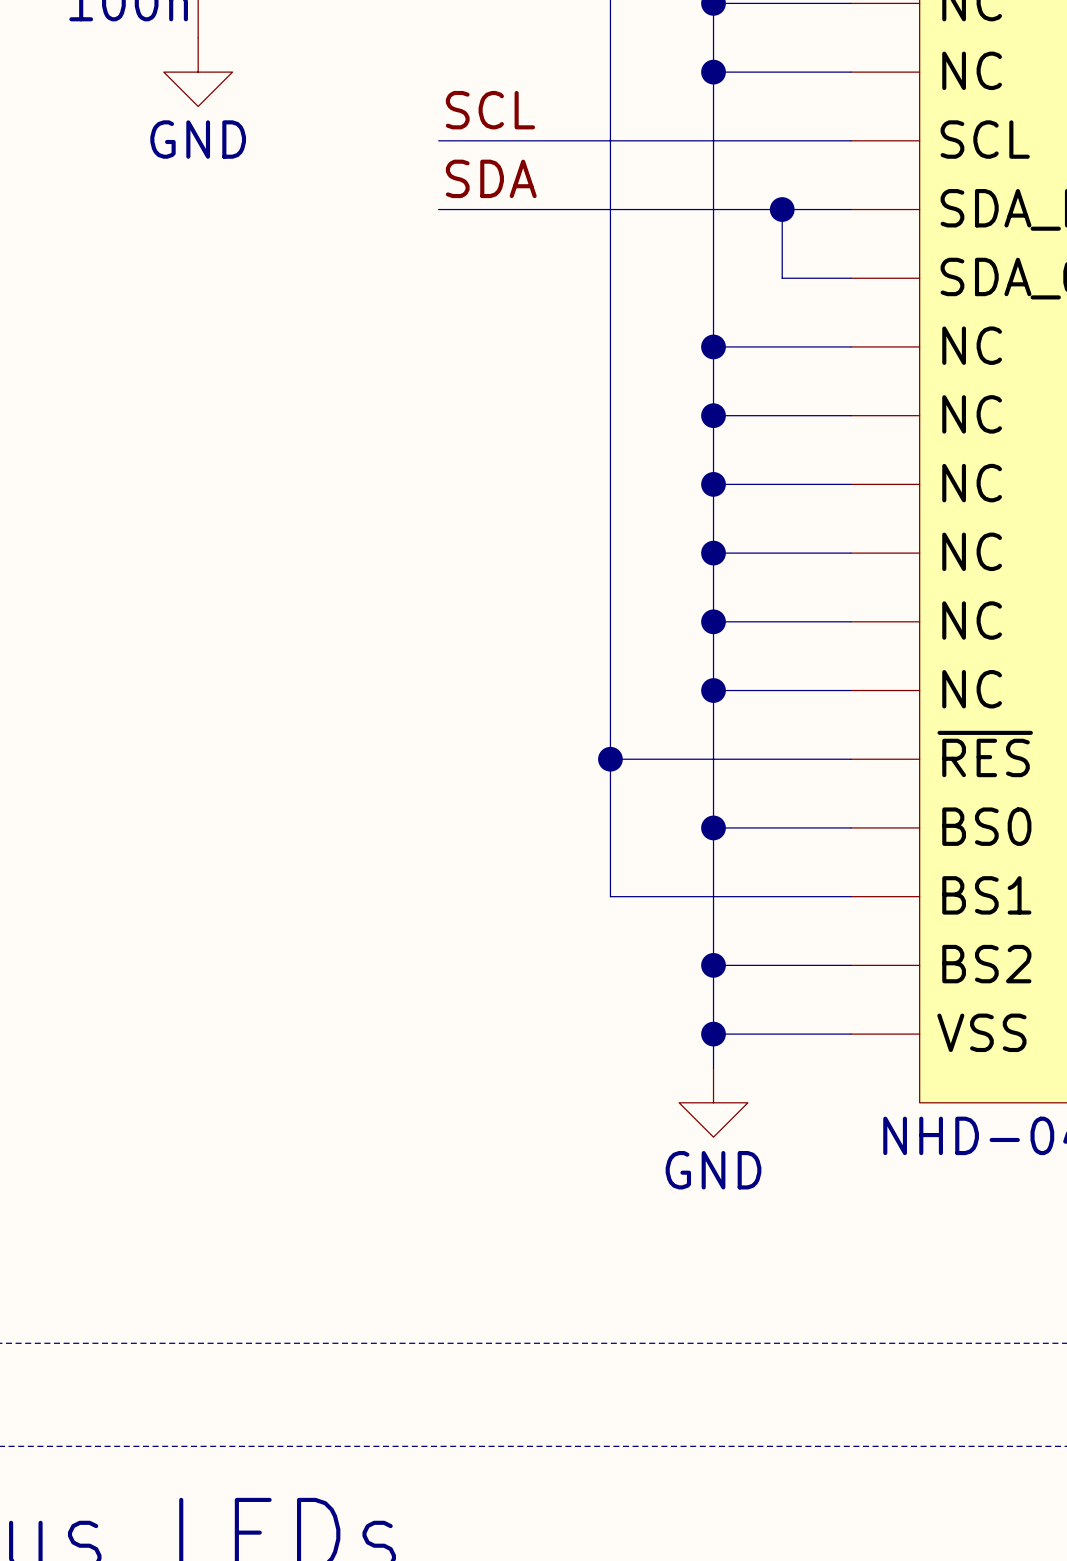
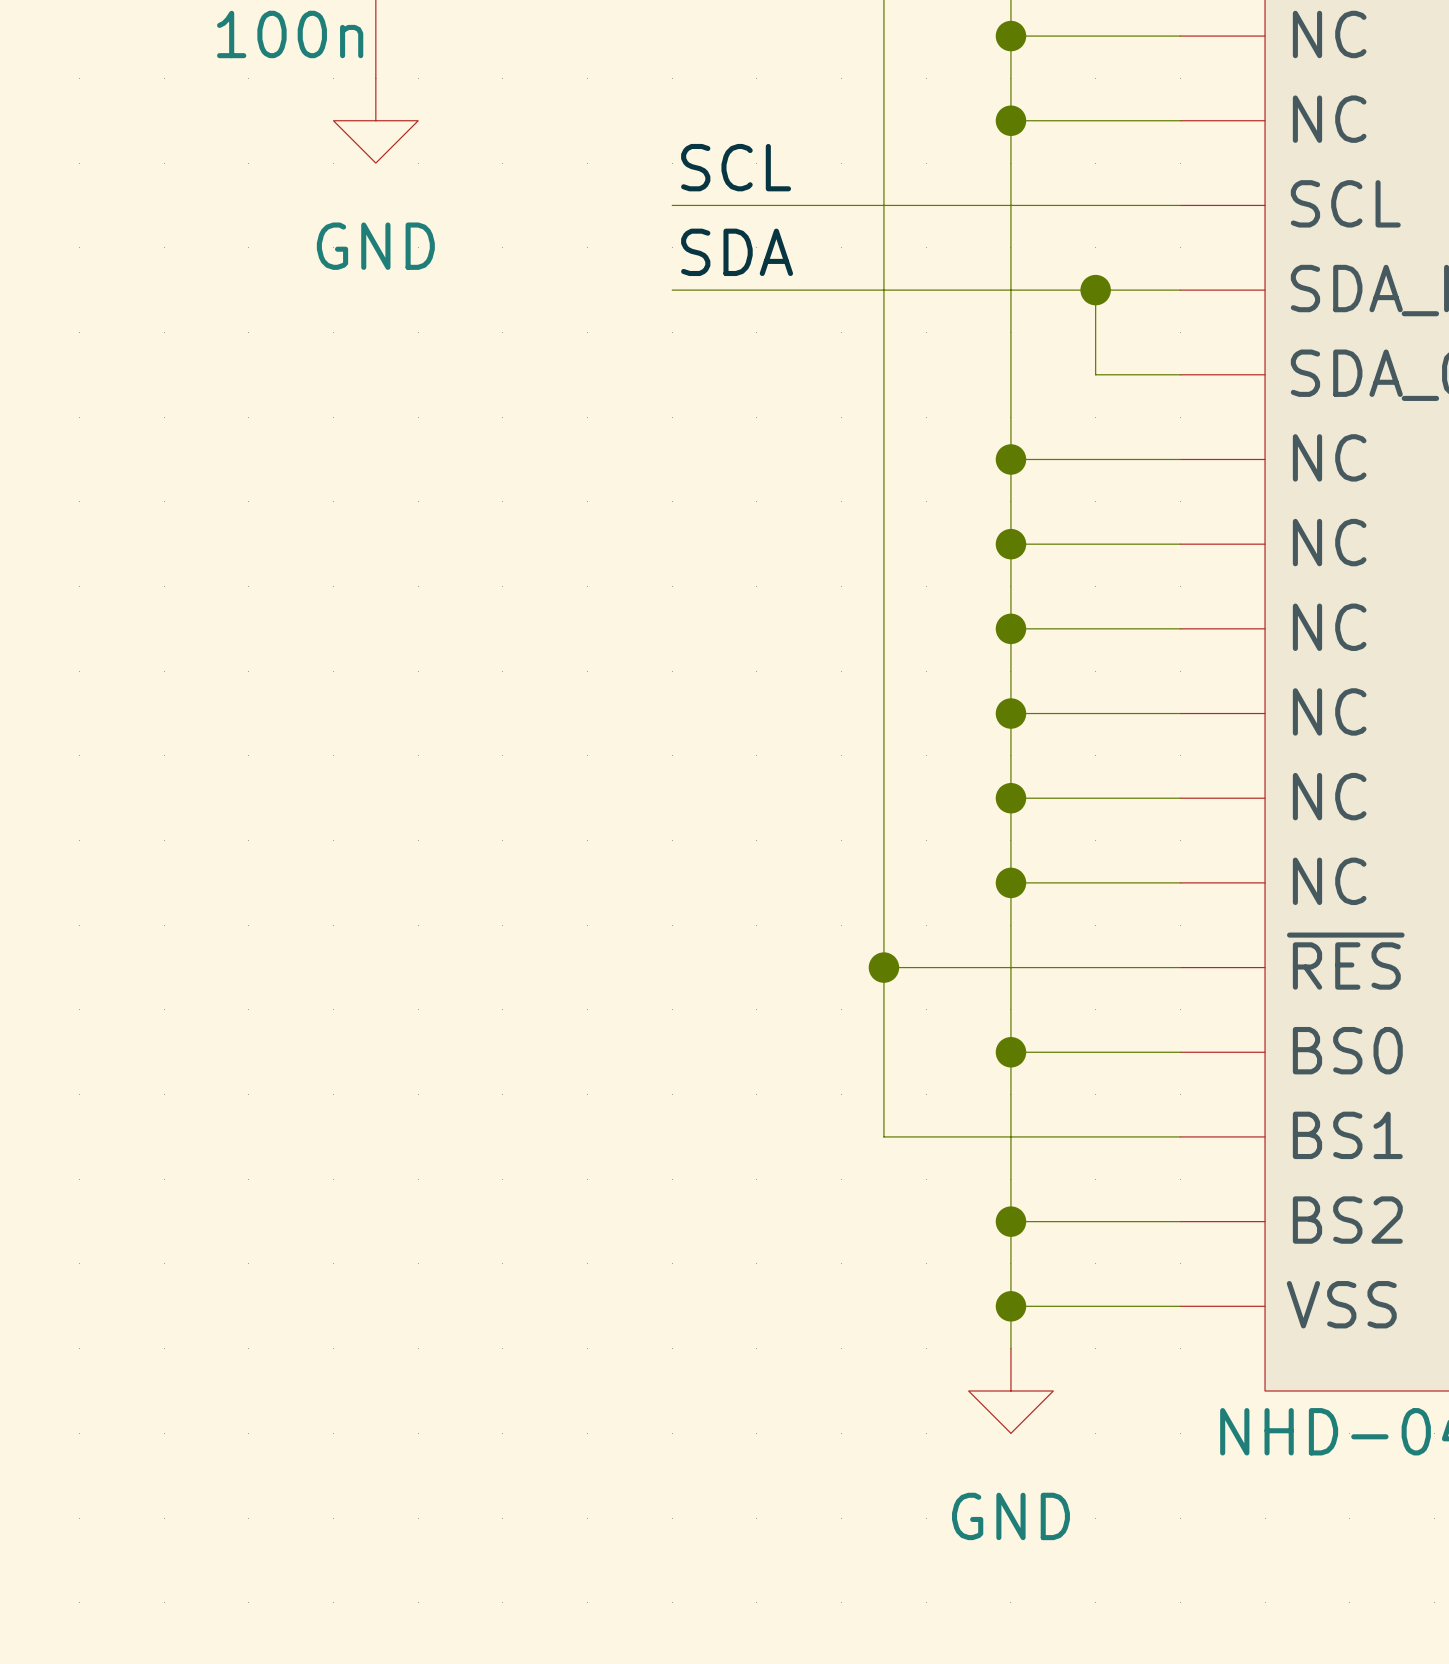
power symbol text position: GND (198, 139) -> GND (375, 246)
power symbol text position: GND (713, 1170) -> GND (1010, 1516)

